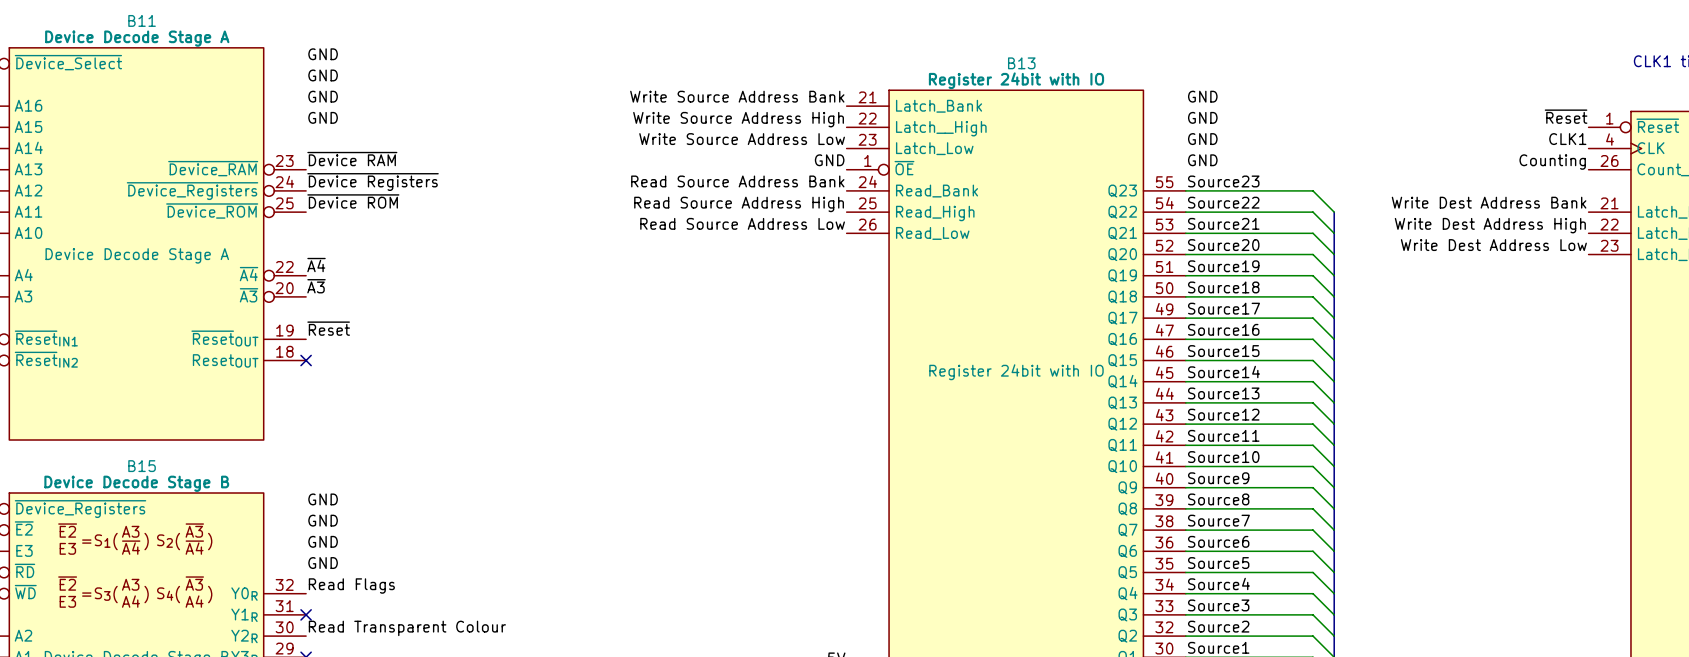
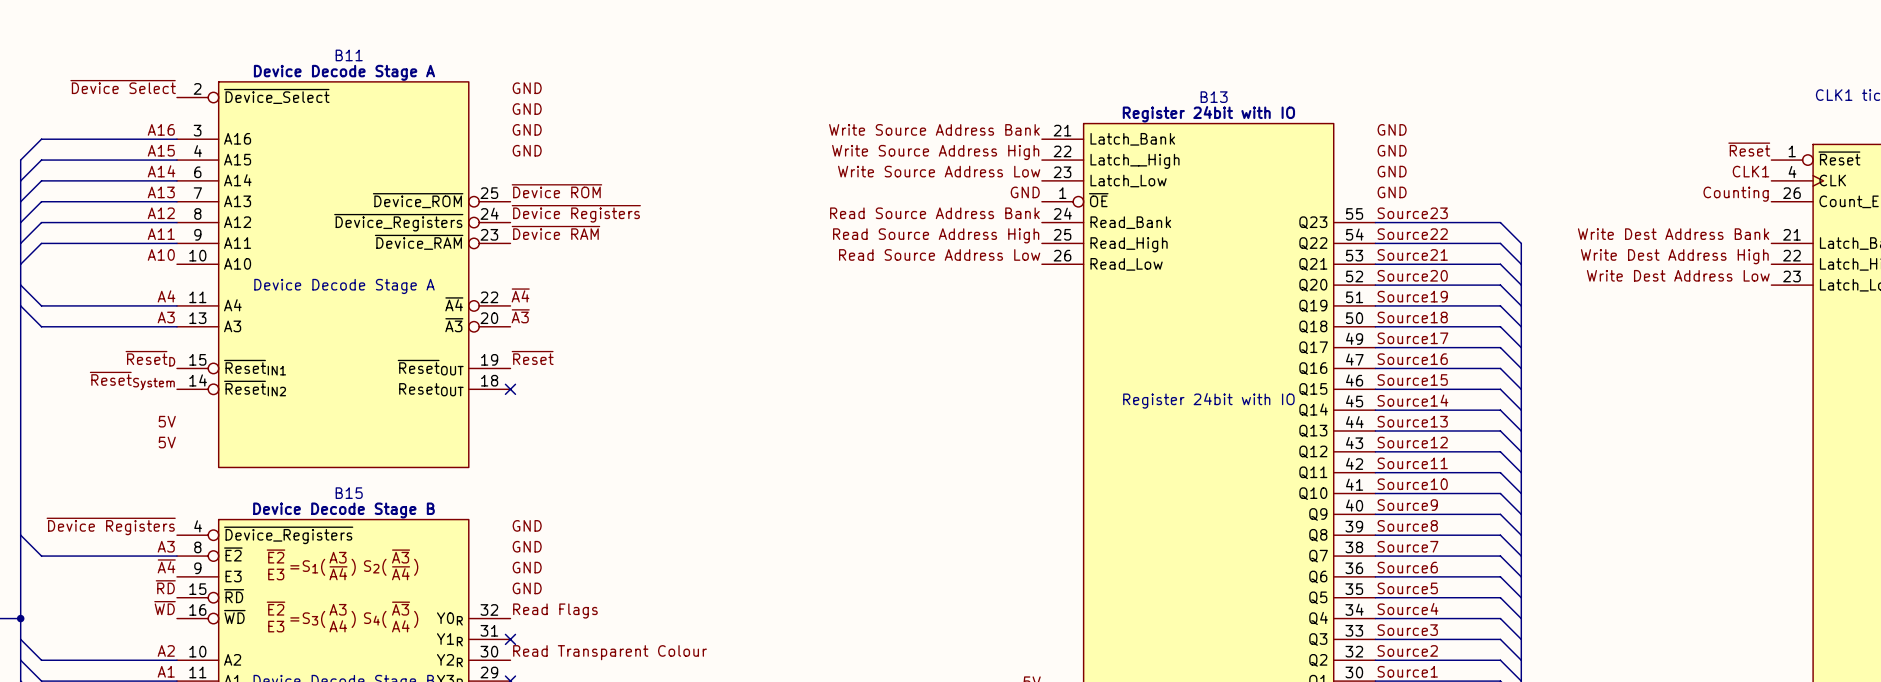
label: ~{Device RAM} (352, 159) -> ~{Device ROM} (556, 191)
B11 pin number: 23 (284, 160) -> 25 (489, 193)
B11 pin name: ~{Device_RAM} (213, 168) -> ~{Device_ROM} (418, 200)
label: ~{Device ROM} (353, 201) -> ~{Device RAM} (555, 232)
B11 pin number: 25 (284, 203) -> 23 (489, 234)
B11 pin name: ~{Device_ROM} (212, 211) -> ~{Device_RAM} (419, 242)

